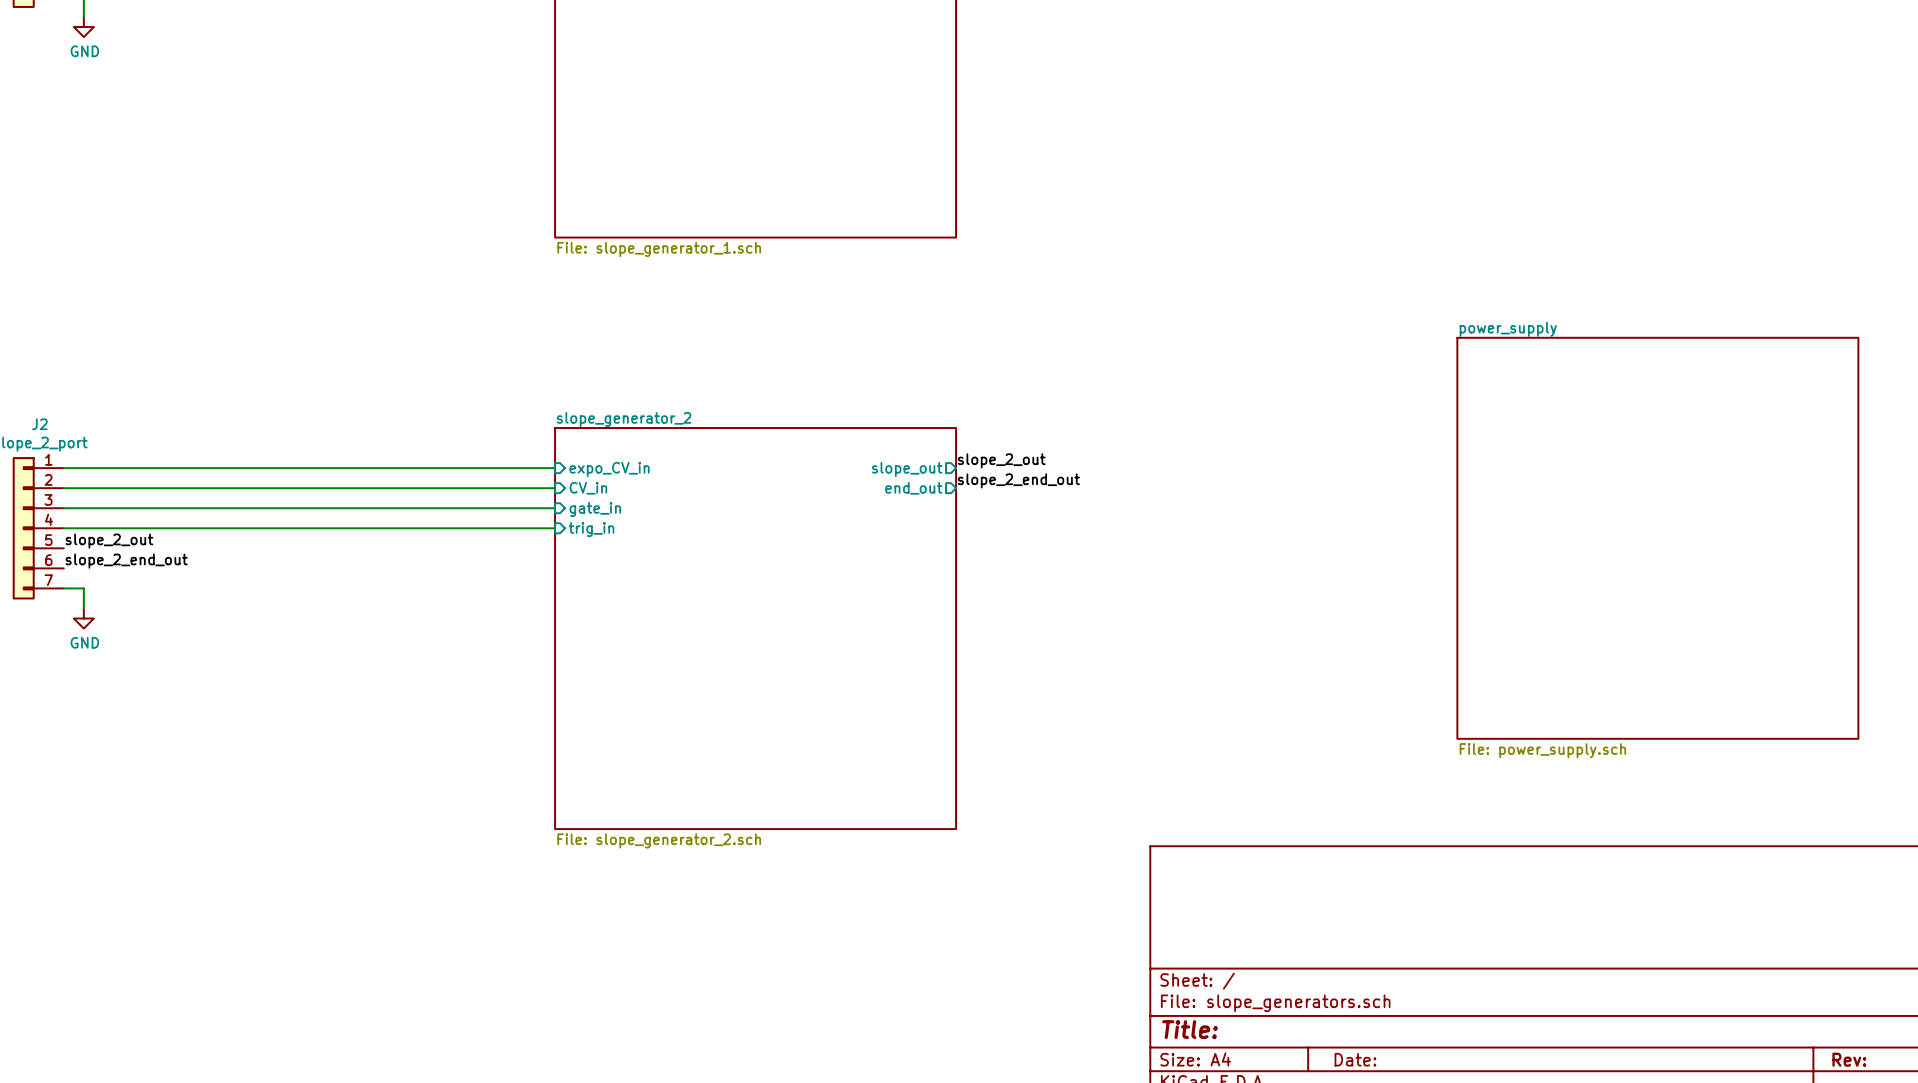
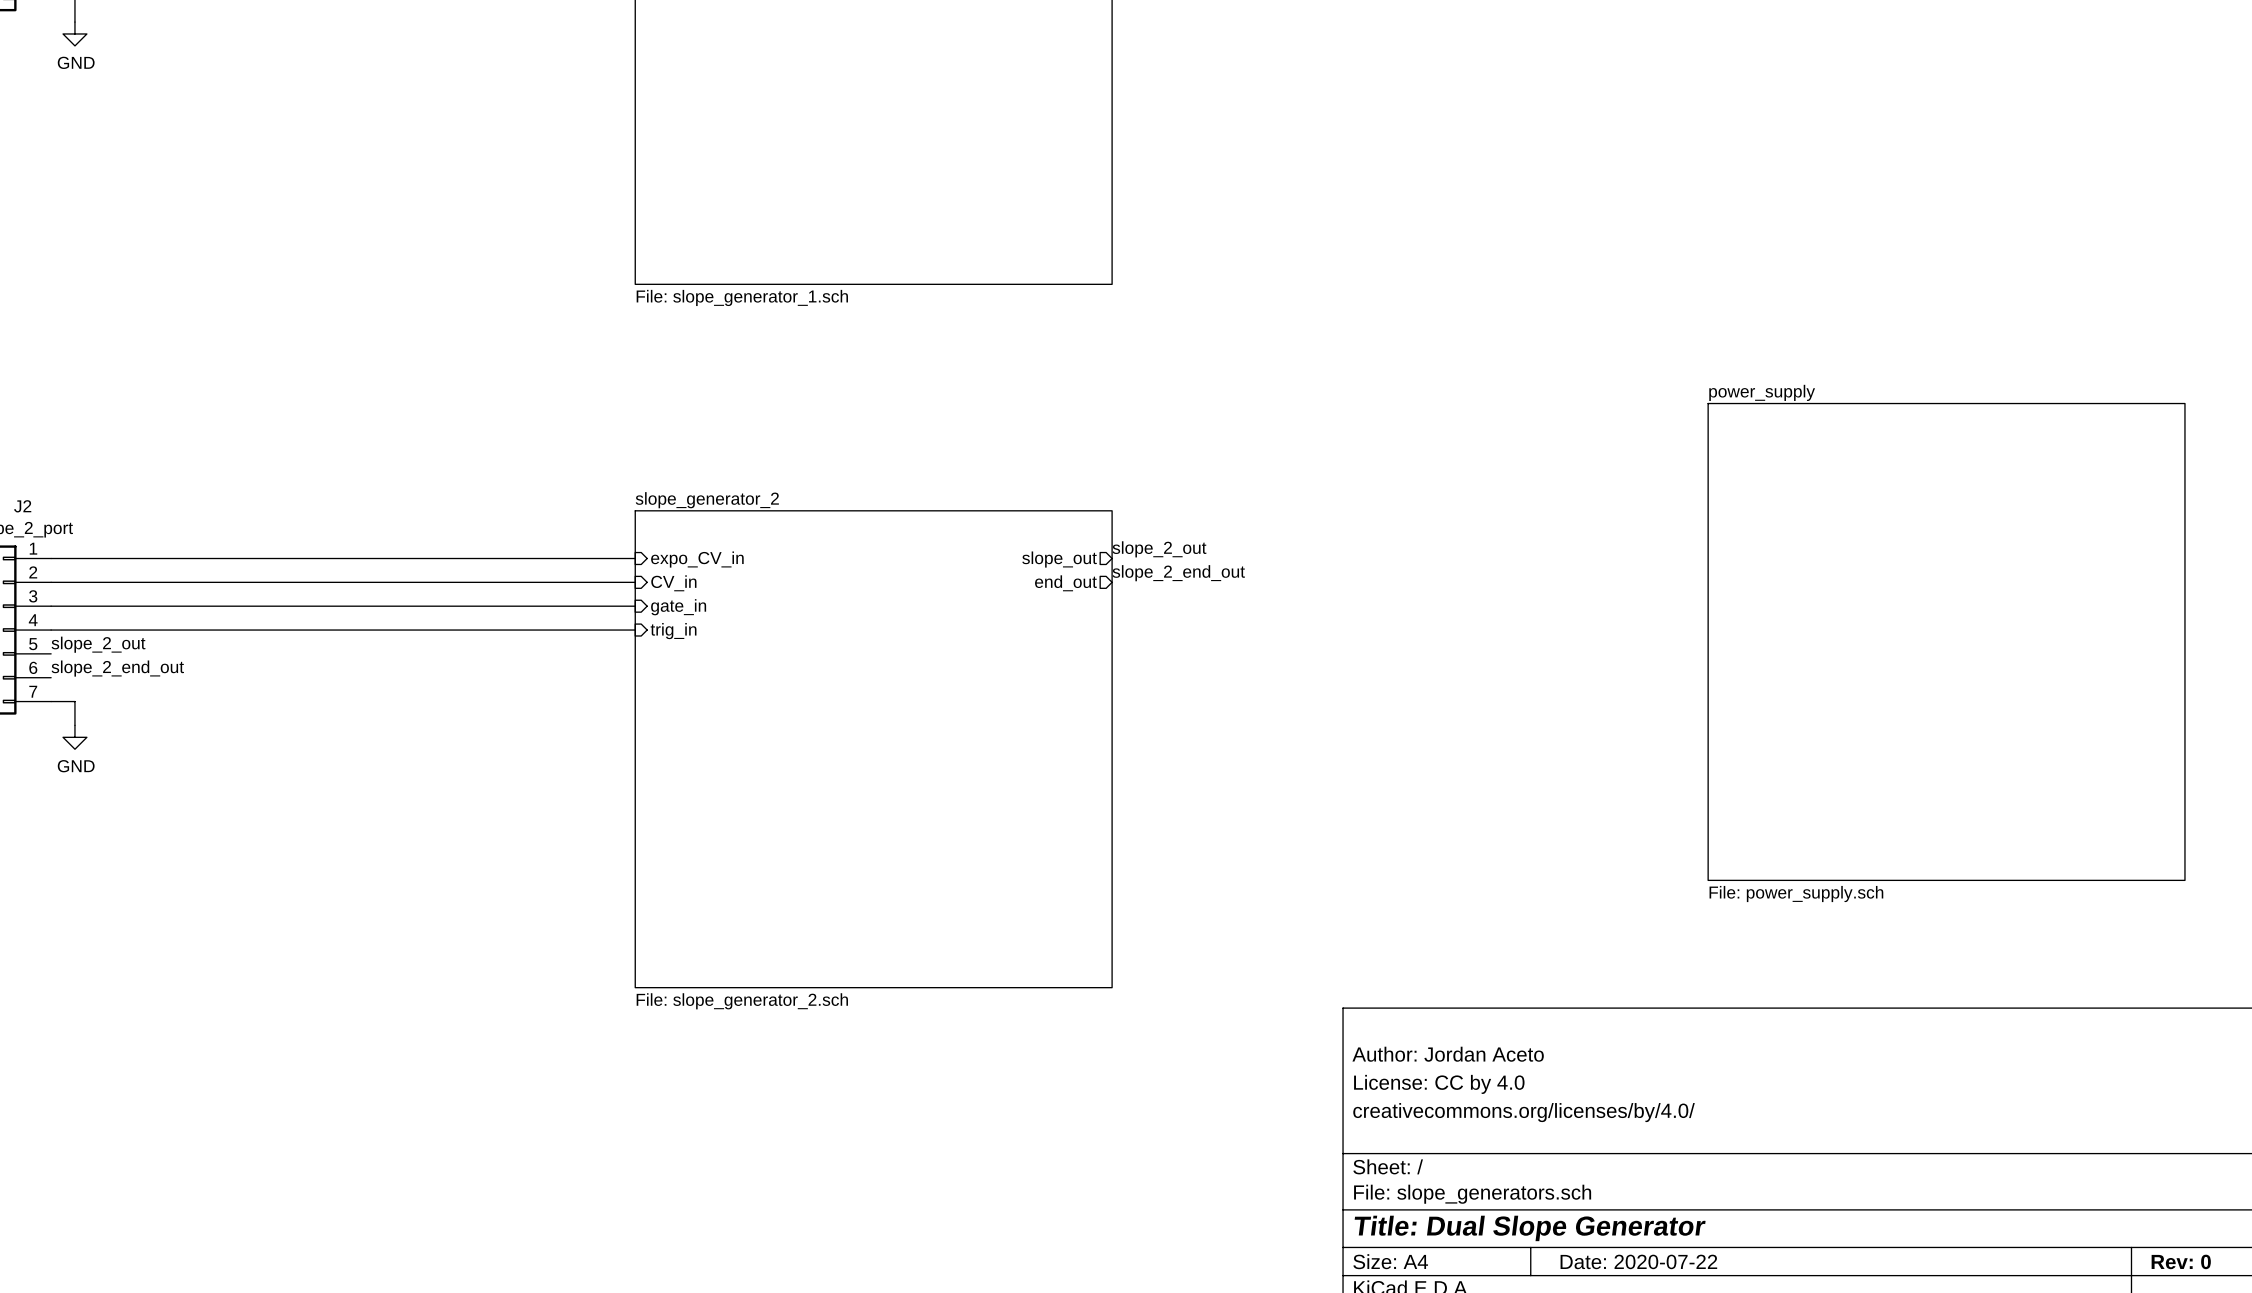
title block: none -> Author: Jordan Aceto (1448, 1054)
title block: none -> License: CC by 4.0 (1439, 1084)
title block: none -> creativecommons.org/licenses/by/4.0/ (1524, 1112)
title block: Title: (1190, 1029) -> Title: Dual Slope Generator (1530, 1228)
title block: Date: (1355, 1059) -> Date: 2020-07-22 (1638, 1261)
title block: Rev: (1849, 1059) -> Rev: 0 (2181, 1261)

